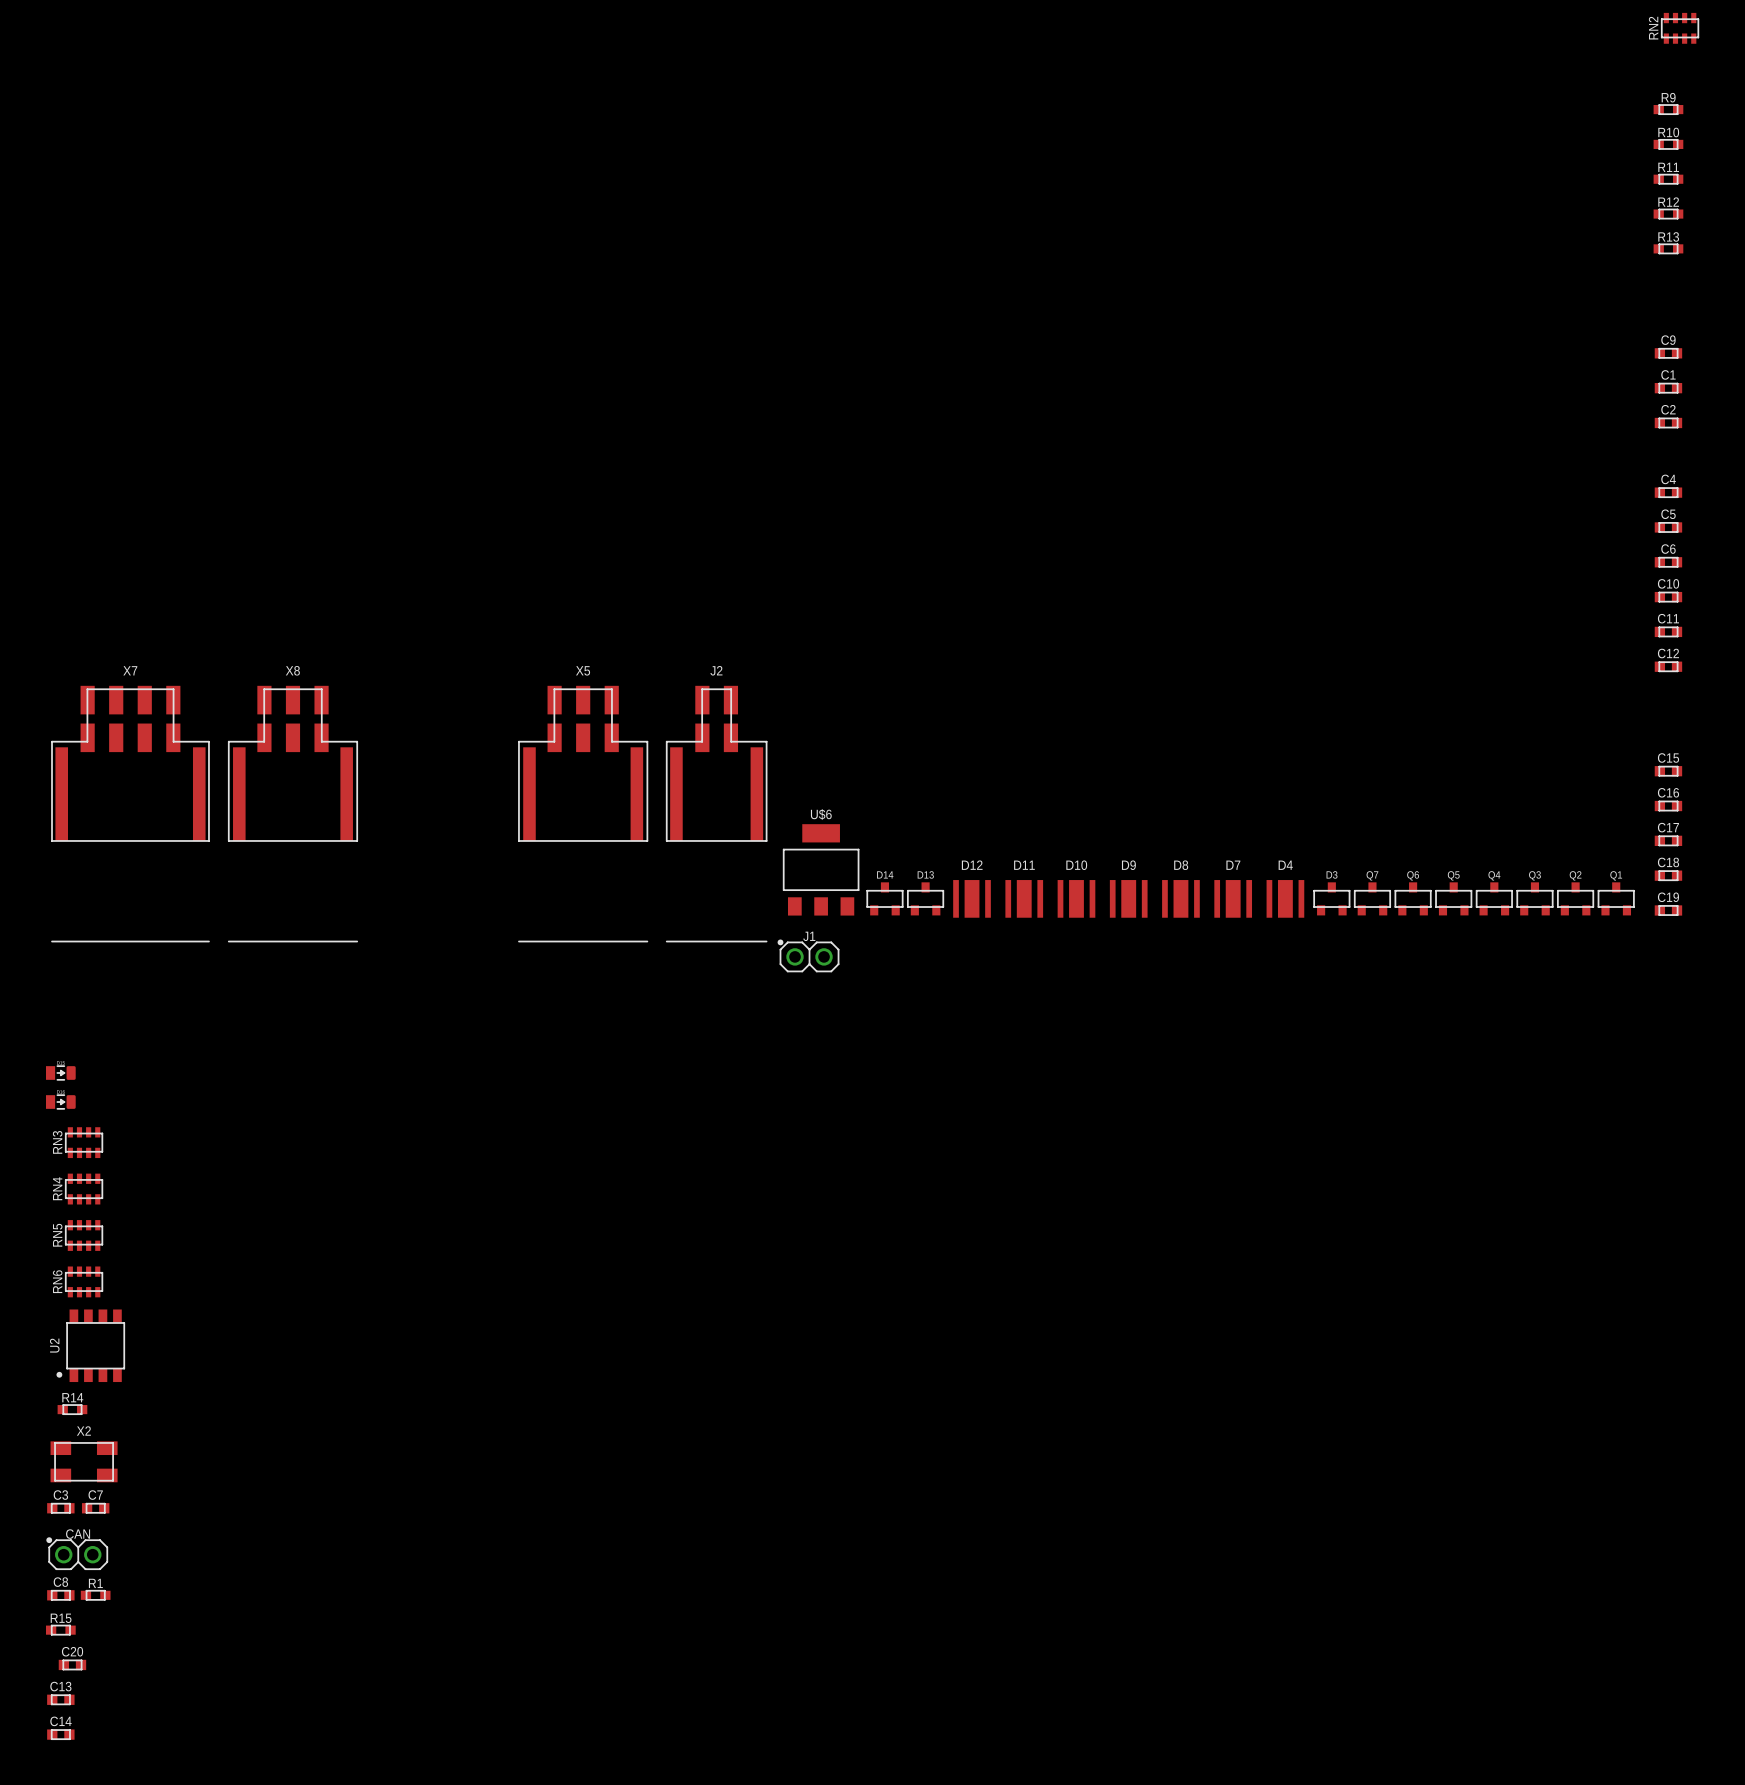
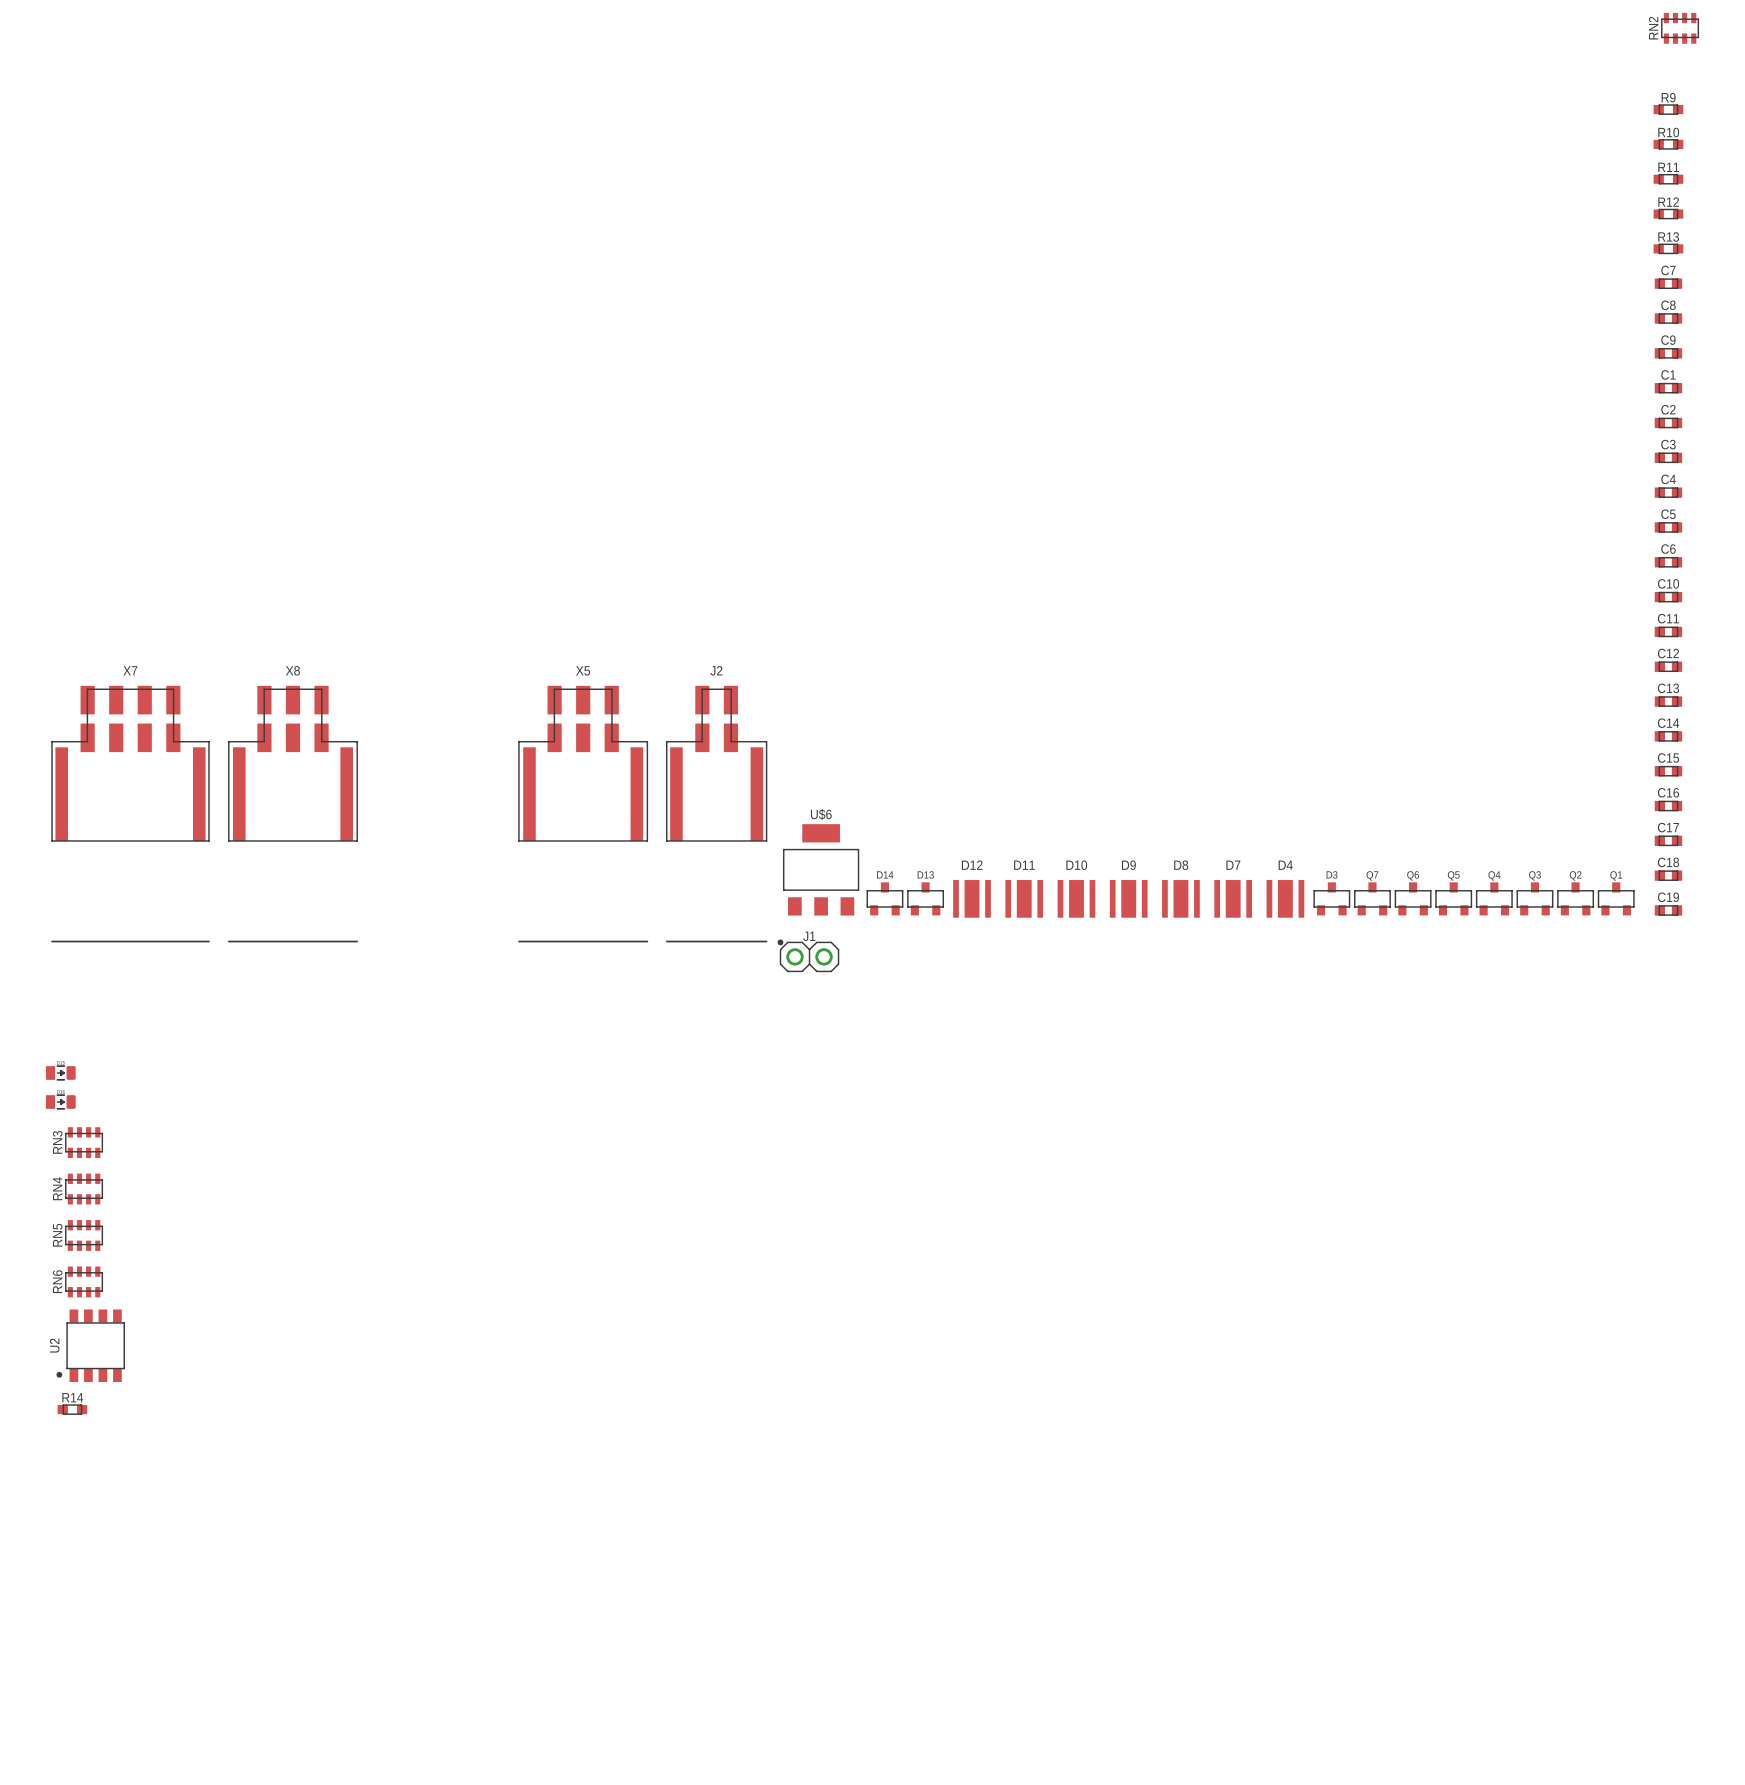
X2: (84, 1461) -> none
C3 position: (60, 1508) -> (1668, 457)
C7 position: (95, 1508) -> (1668, 283)
CAN: (77, 1553) -> none
C8 position: (60, 1595) -> (1668, 318)
R1: (95, 1595) -> none
R15: (60, 1630) -> none
C20: (72, 1664) -> none
C13 position: (60, 1699) -> (1668, 701)
C14 position: (60, 1734) -> (1668, 736)

